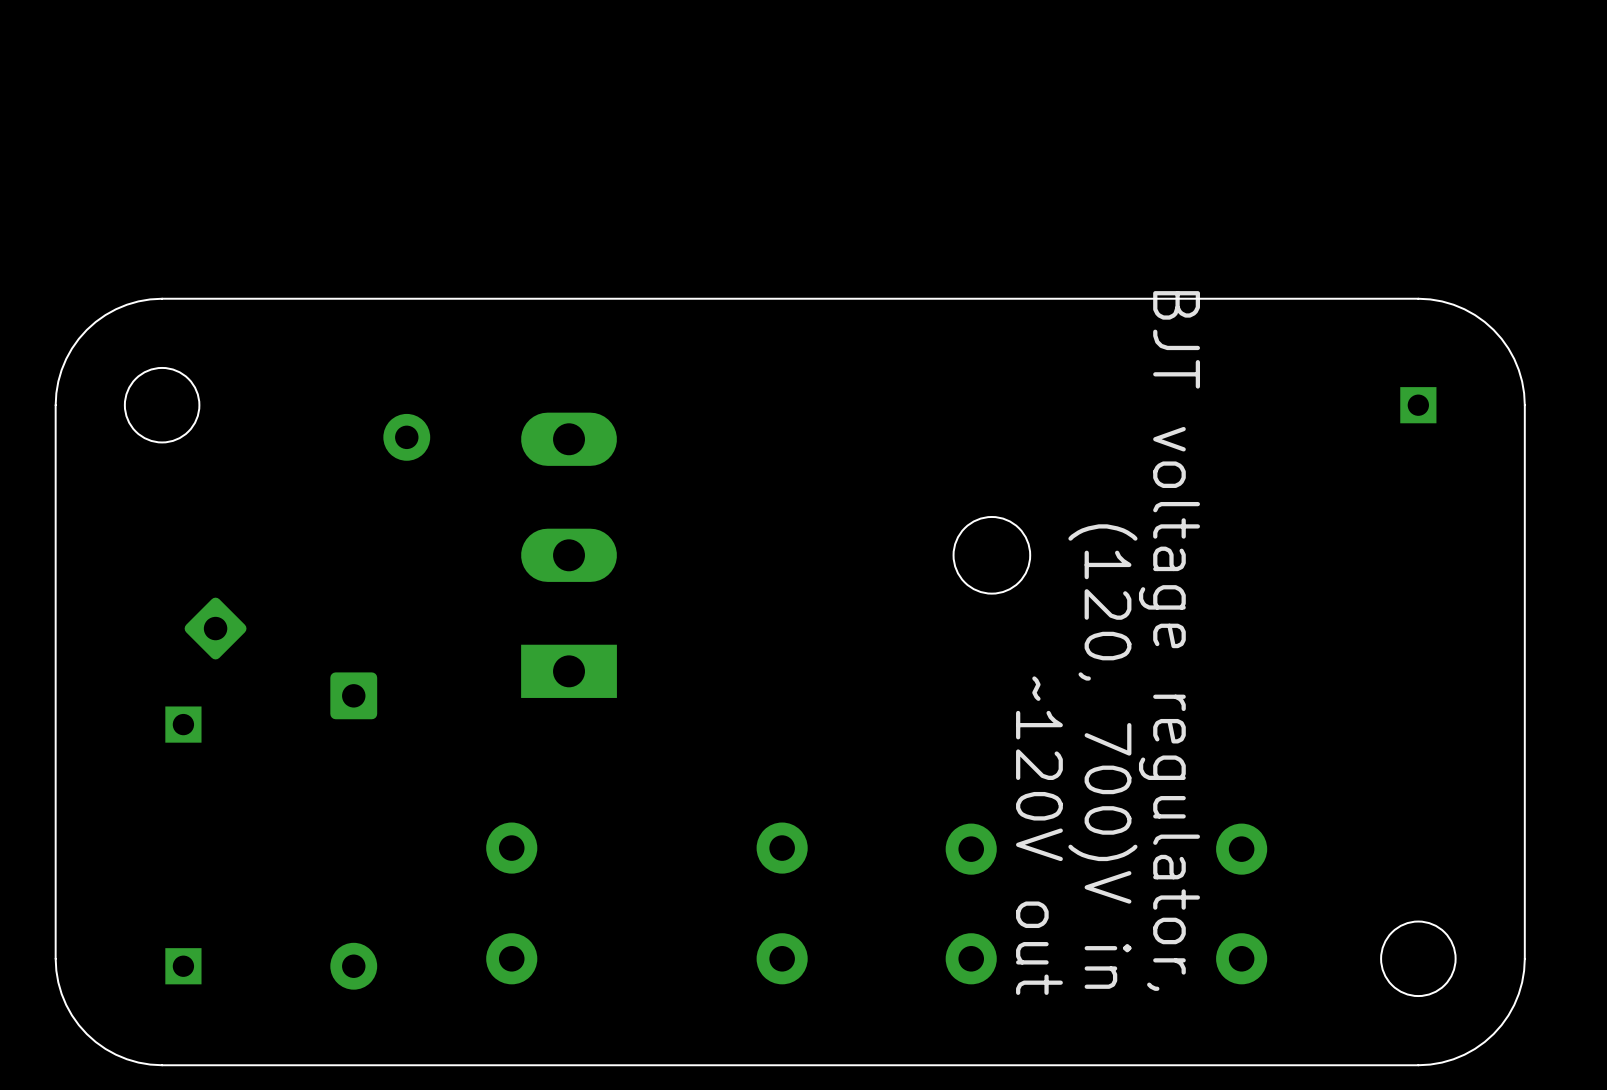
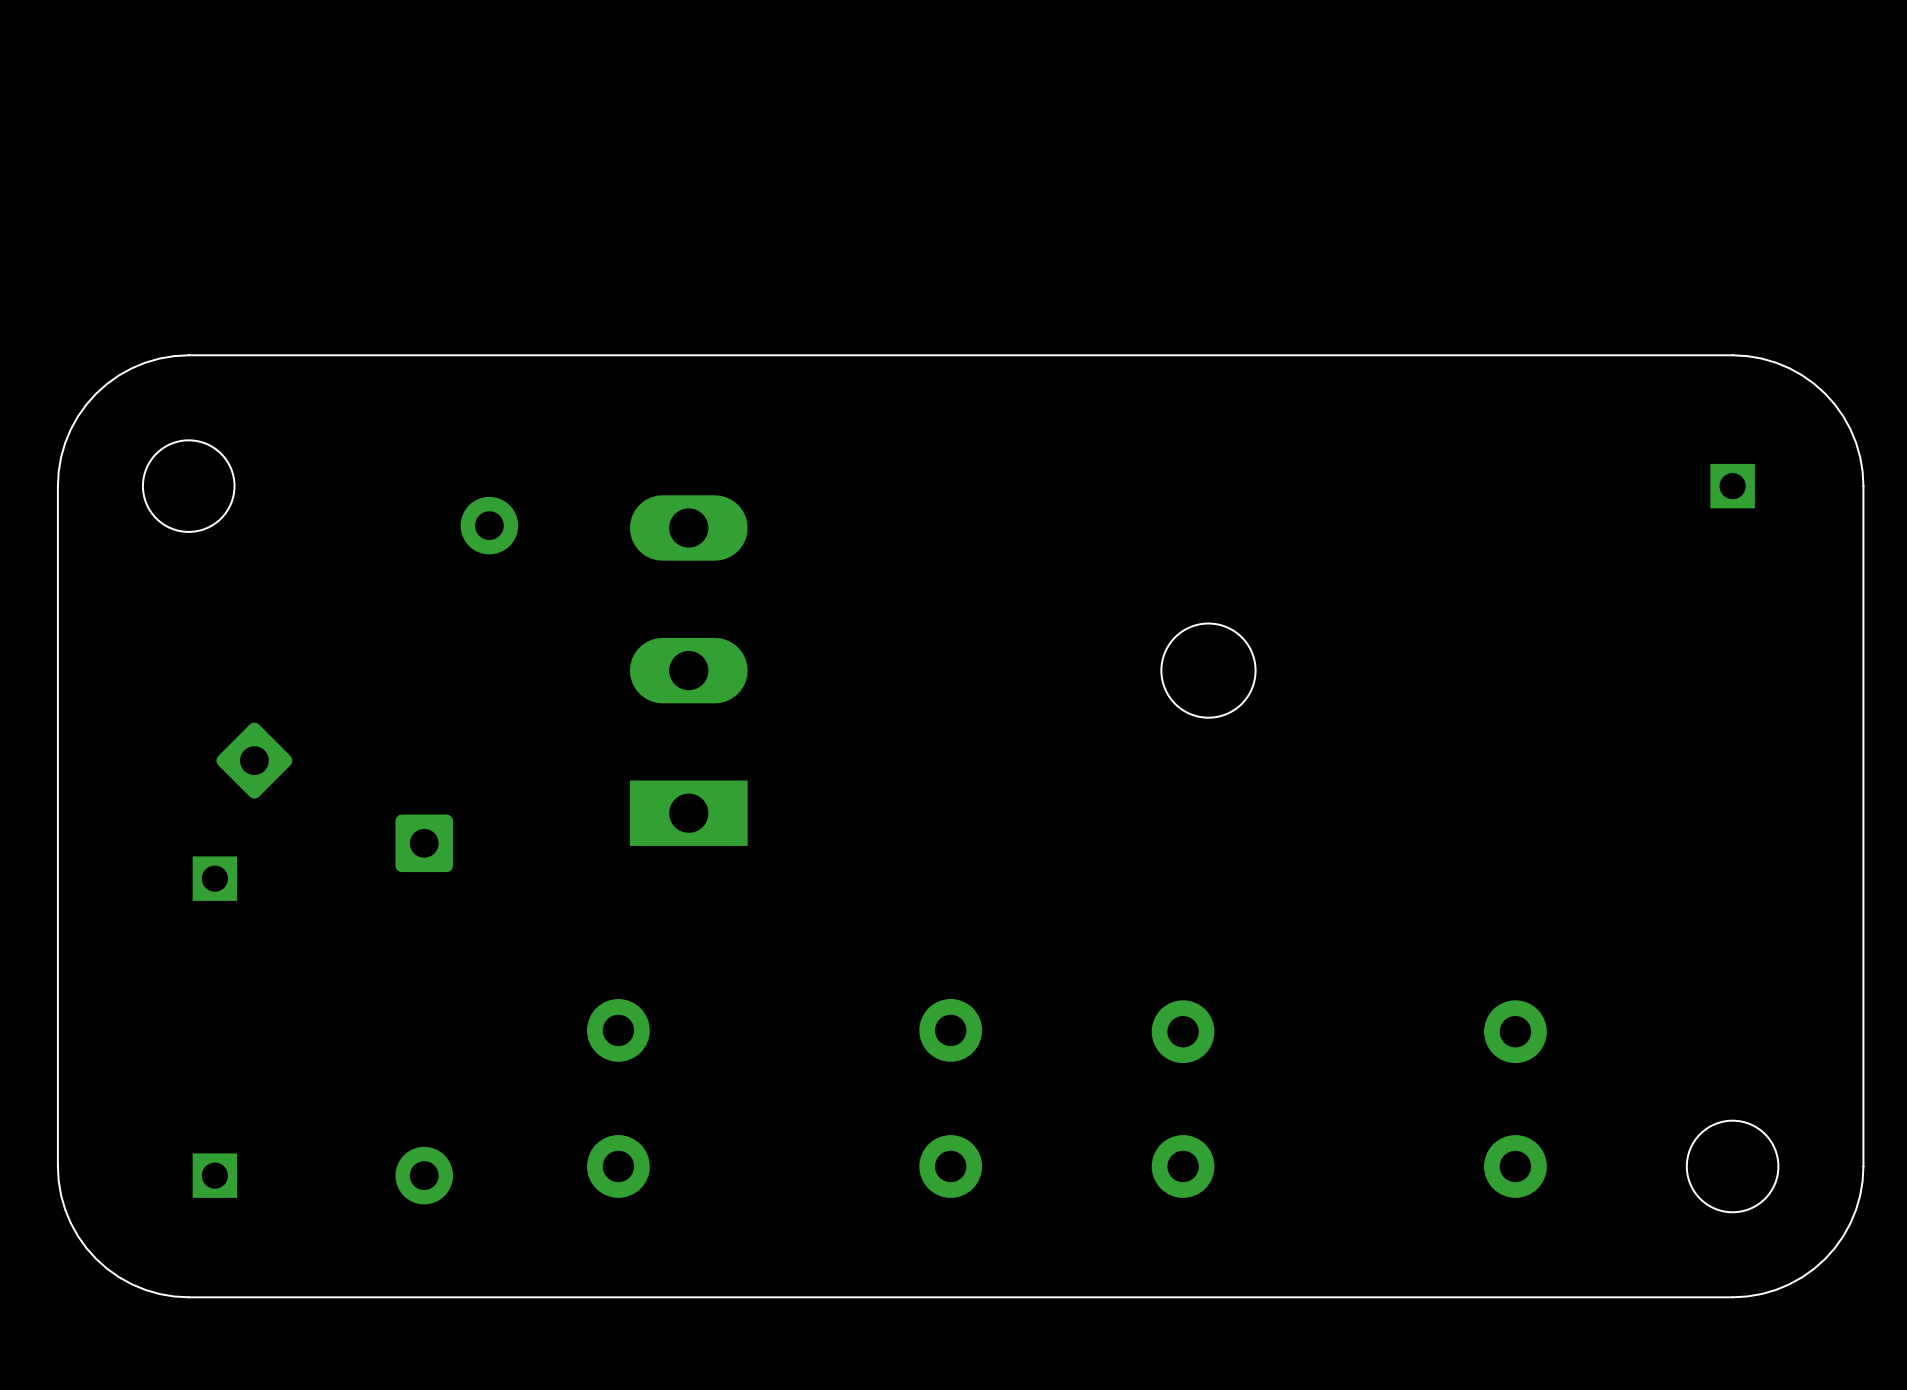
text: BJT voltage regulator, (1169, 640) -> none
text: (120, 700)V in (1102, 756) -> none
text: ~120V out (1039, 835) -> none

